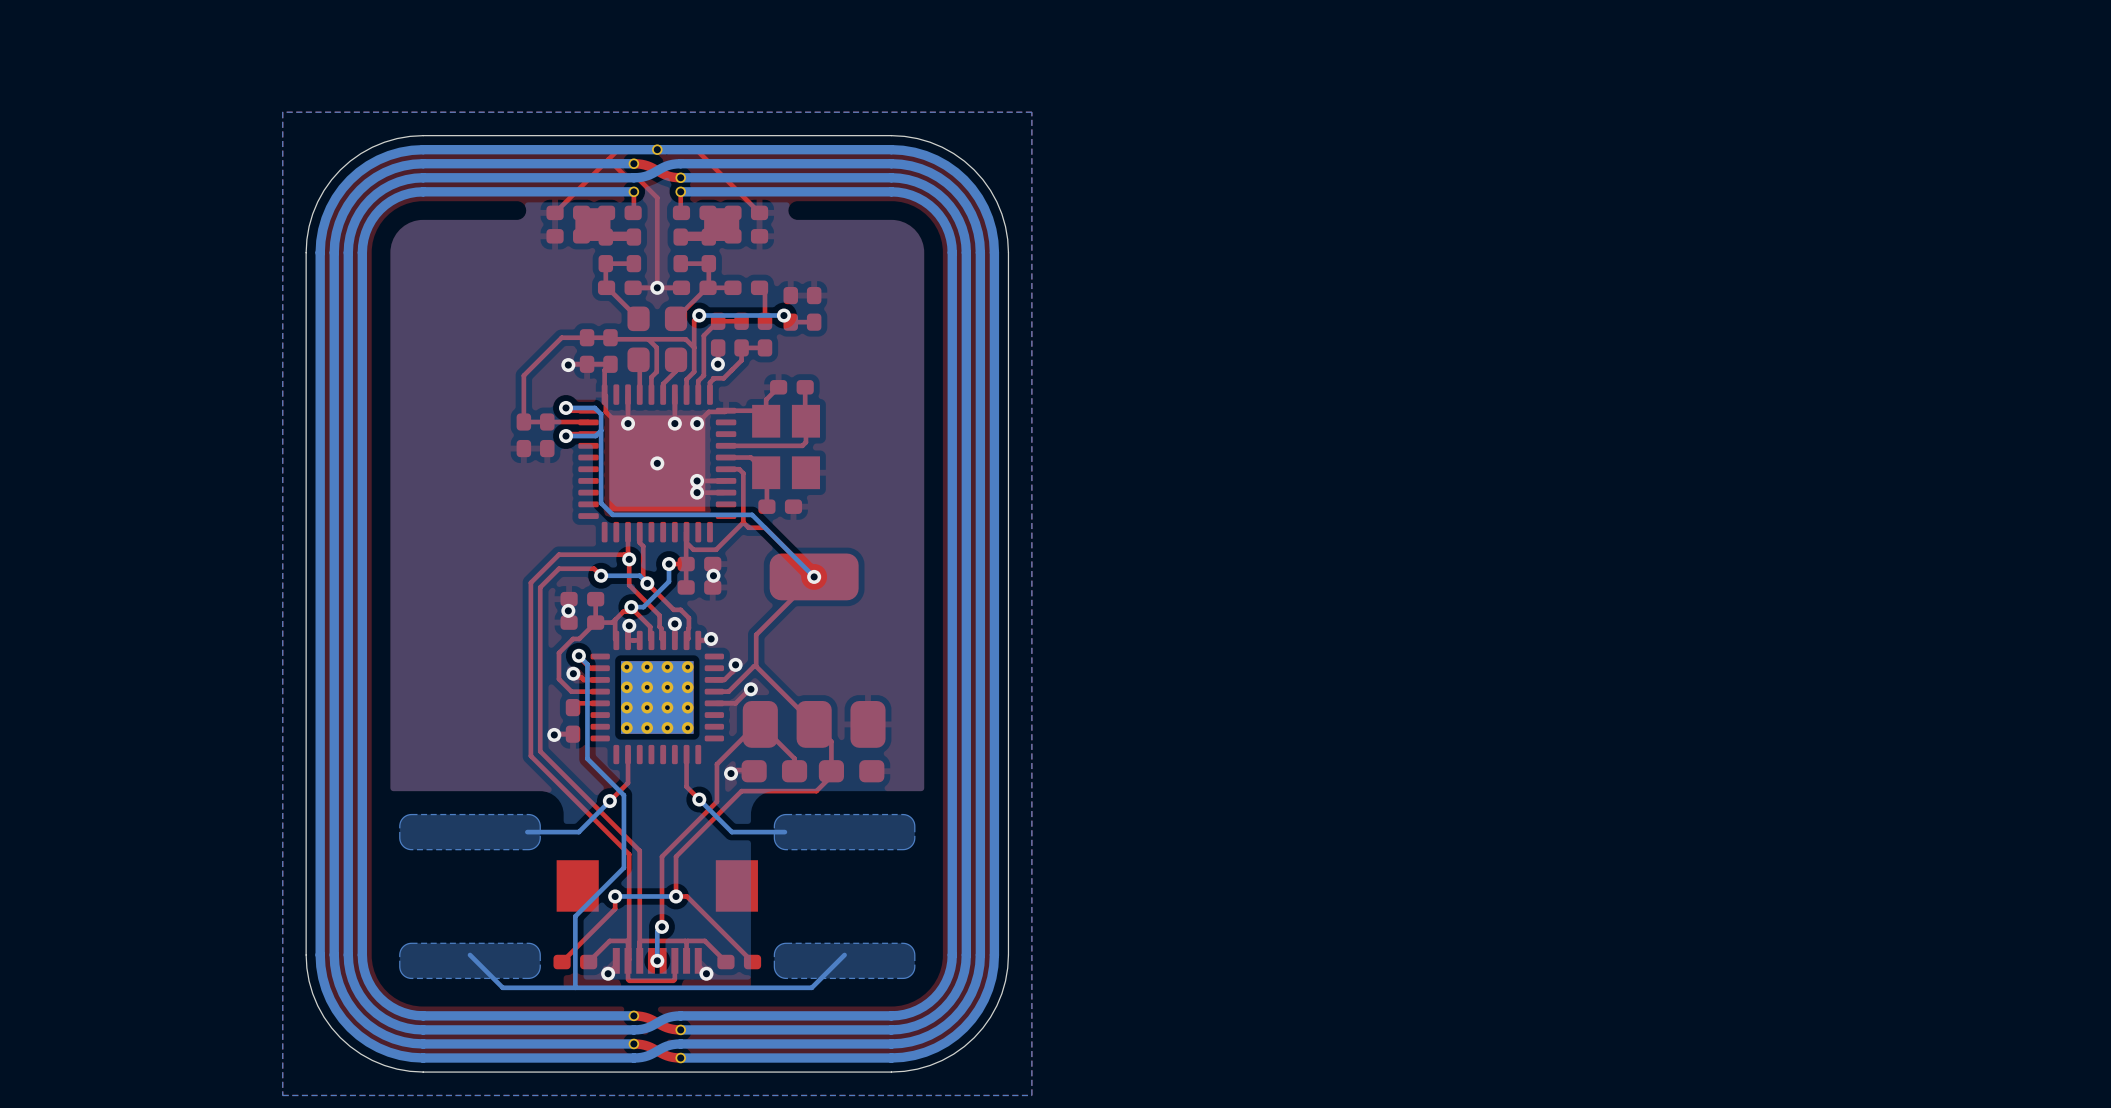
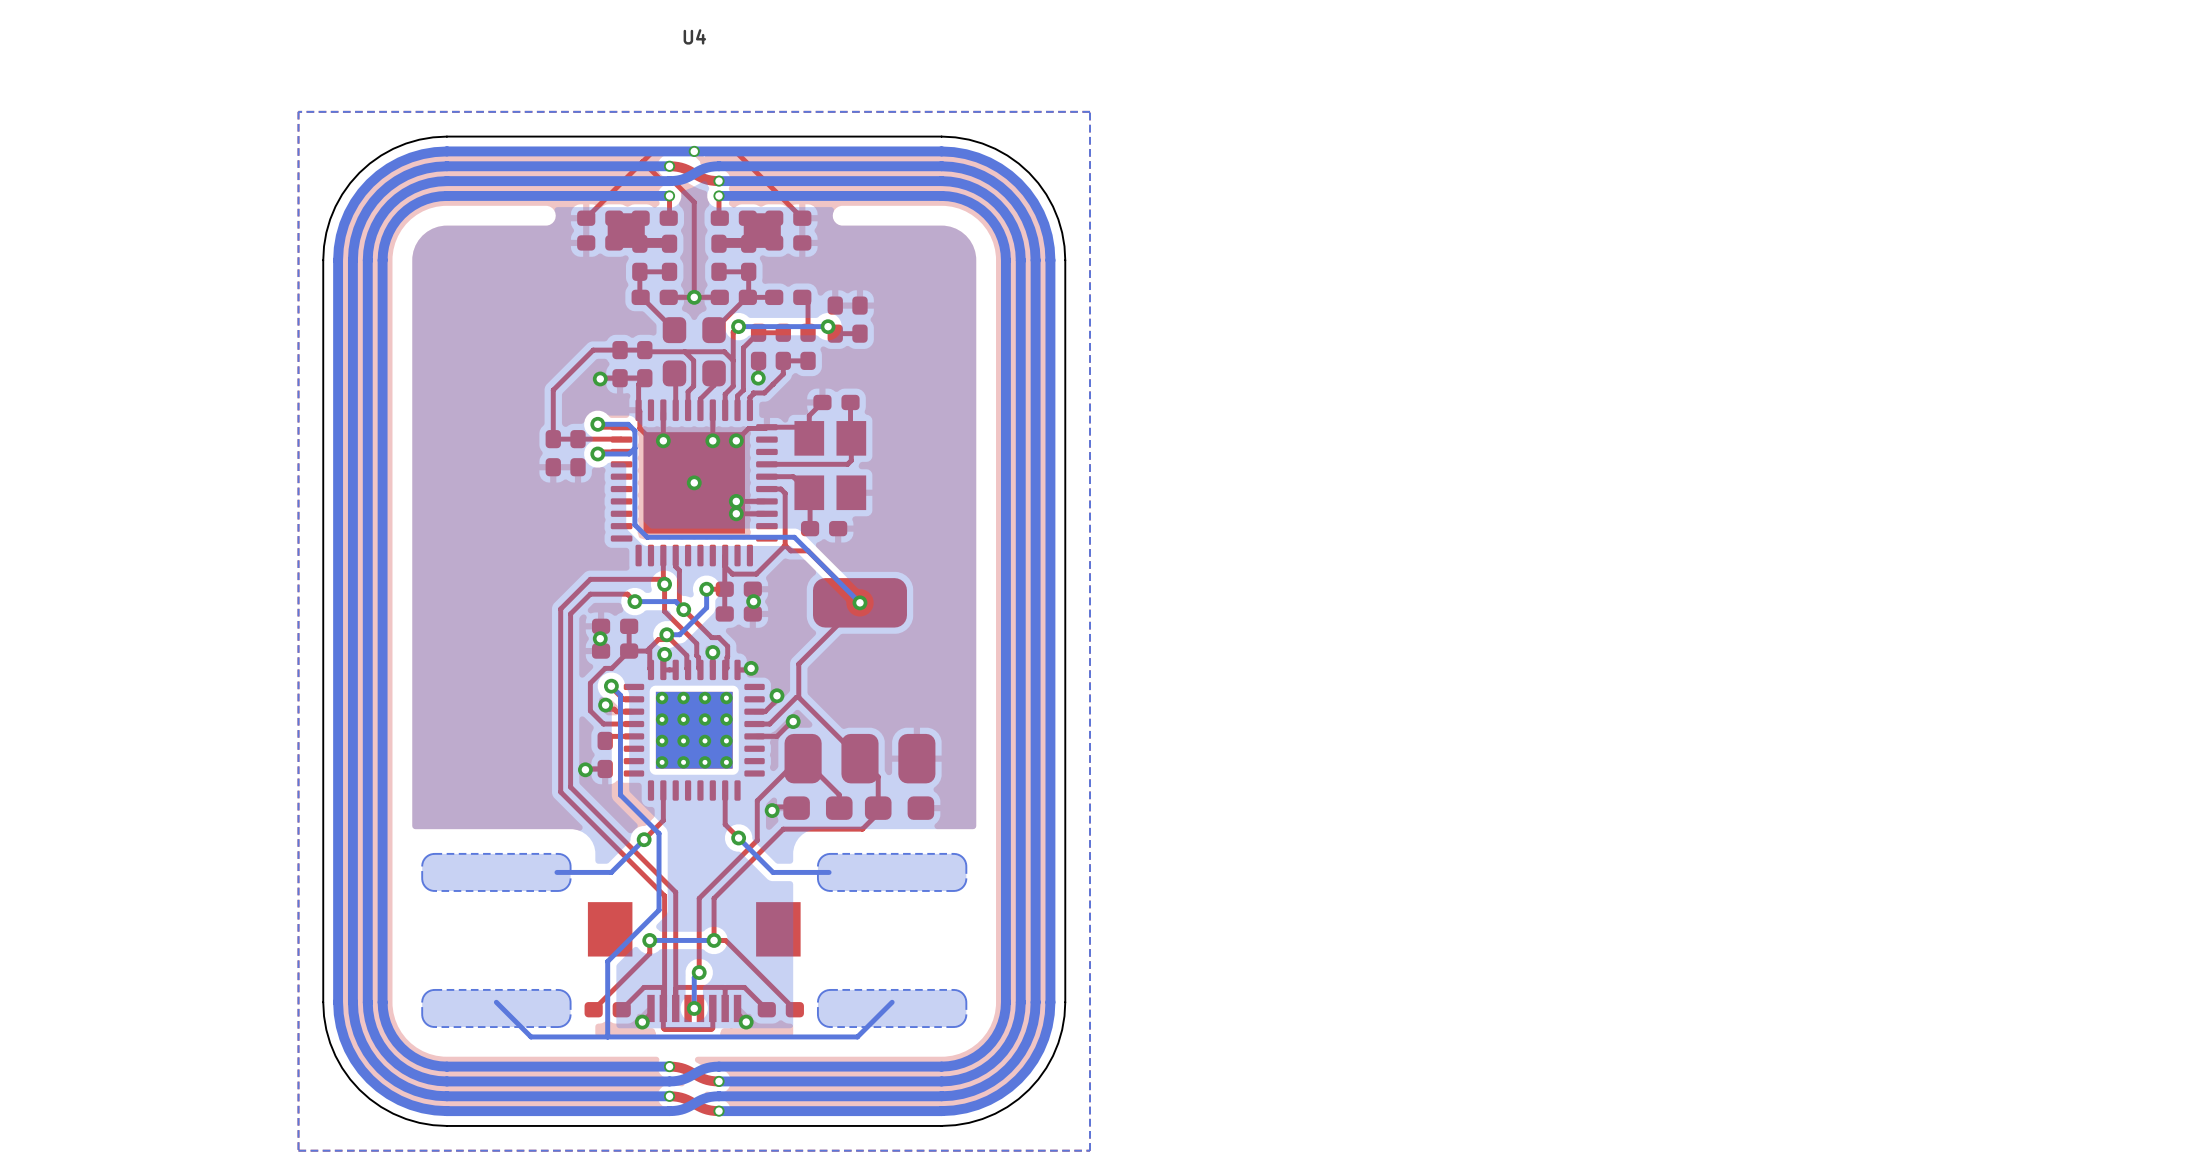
U4 name: none -> U4 (694, 36)

